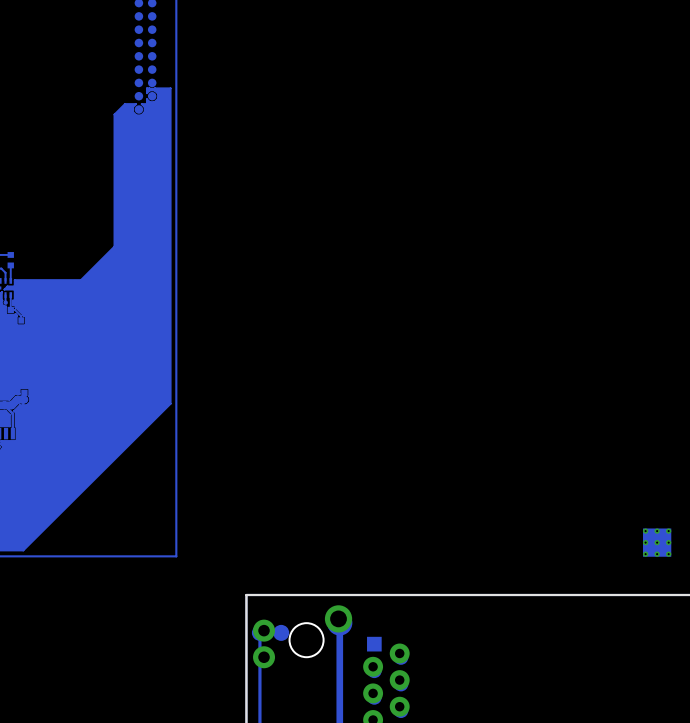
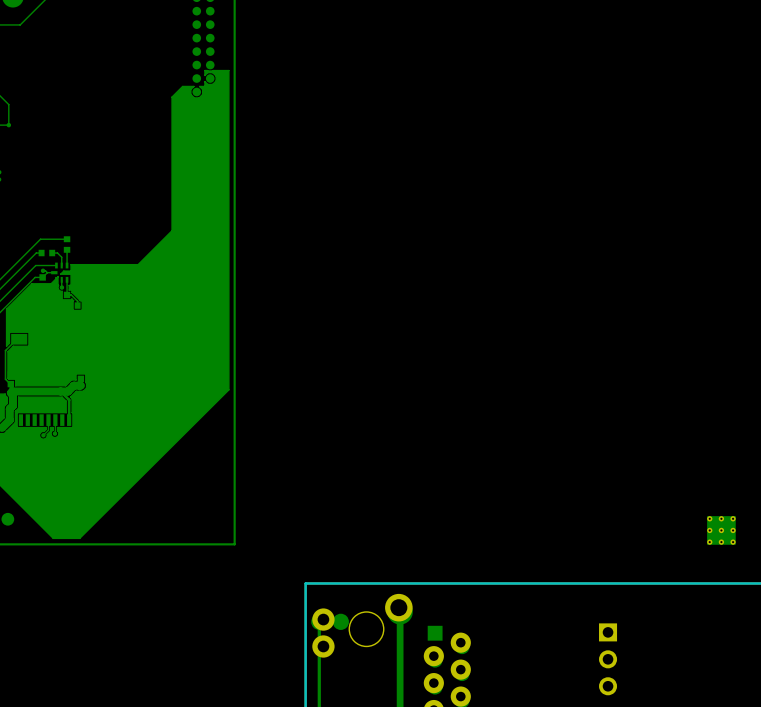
part: none -> (608, 659)

